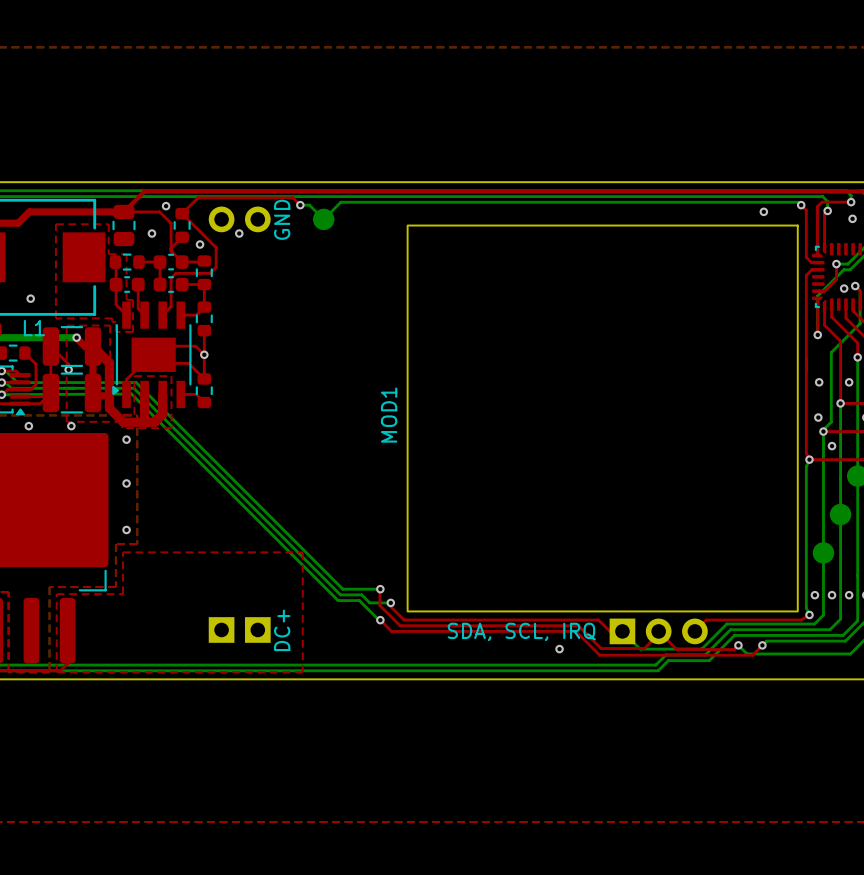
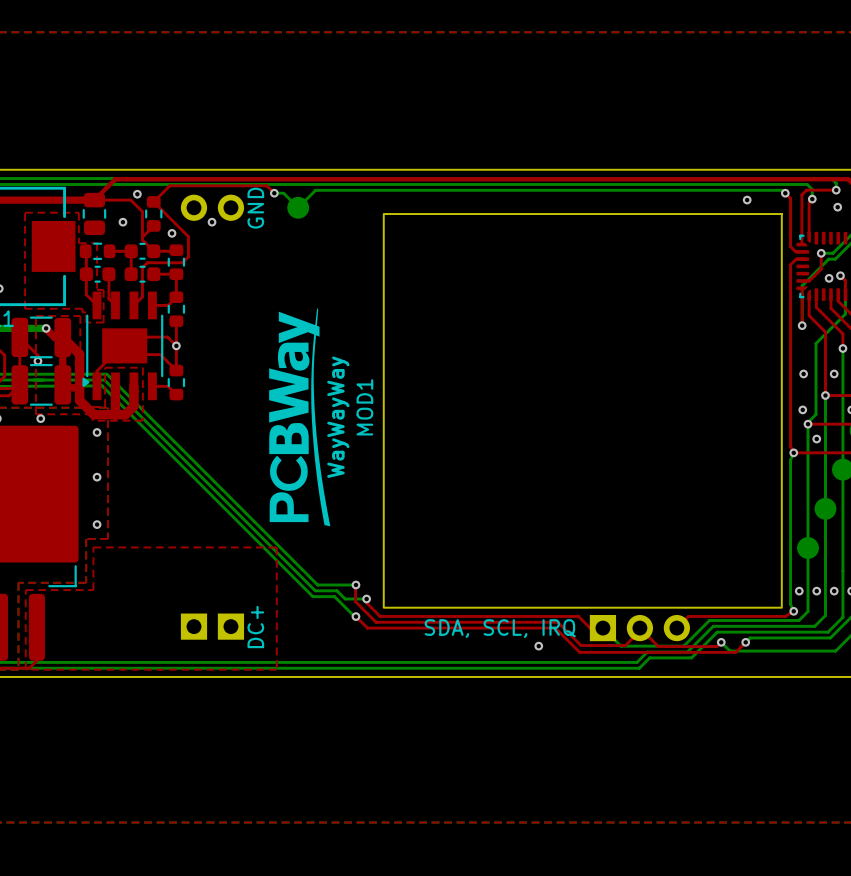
drawing: none -> [269, 308, 331, 527]
text: none -> WayWayWay (338, 417)

